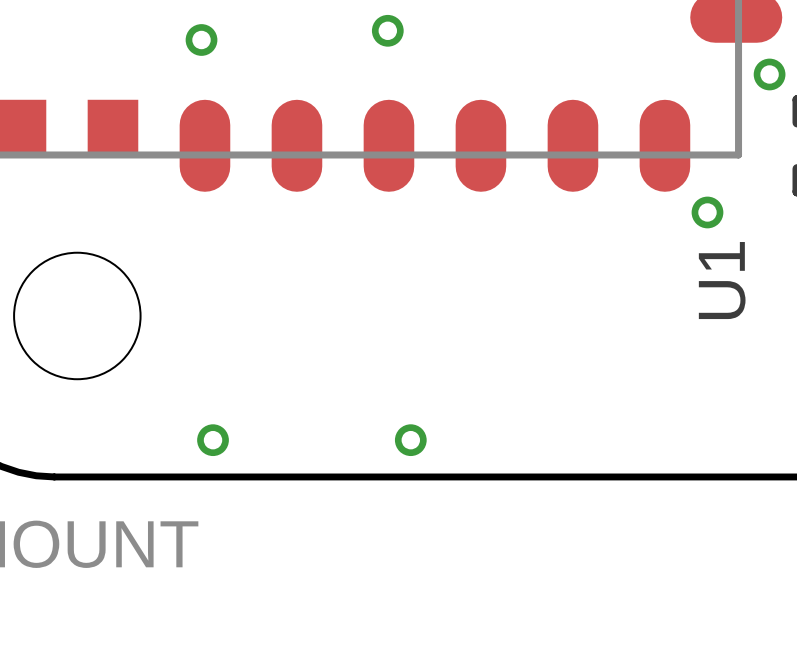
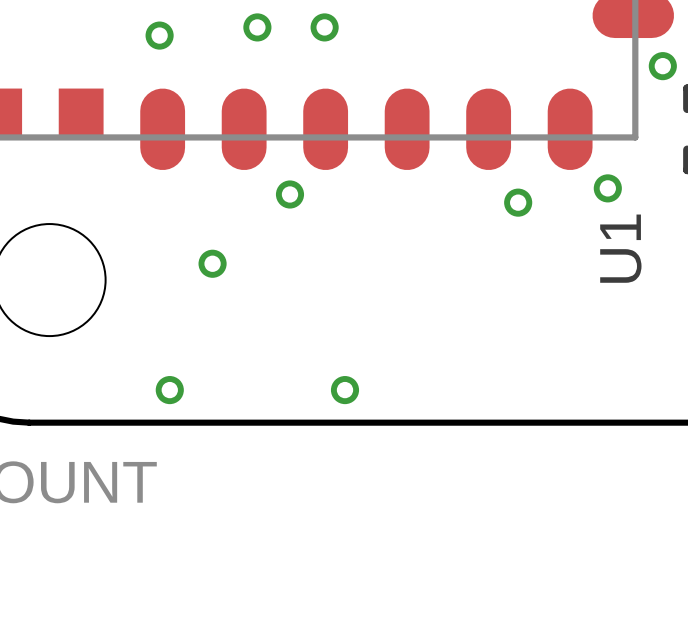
part: none -> (257, 27)
part: none -> (289, 194)
part: none -> (518, 202)
part: none -> (212, 263)

